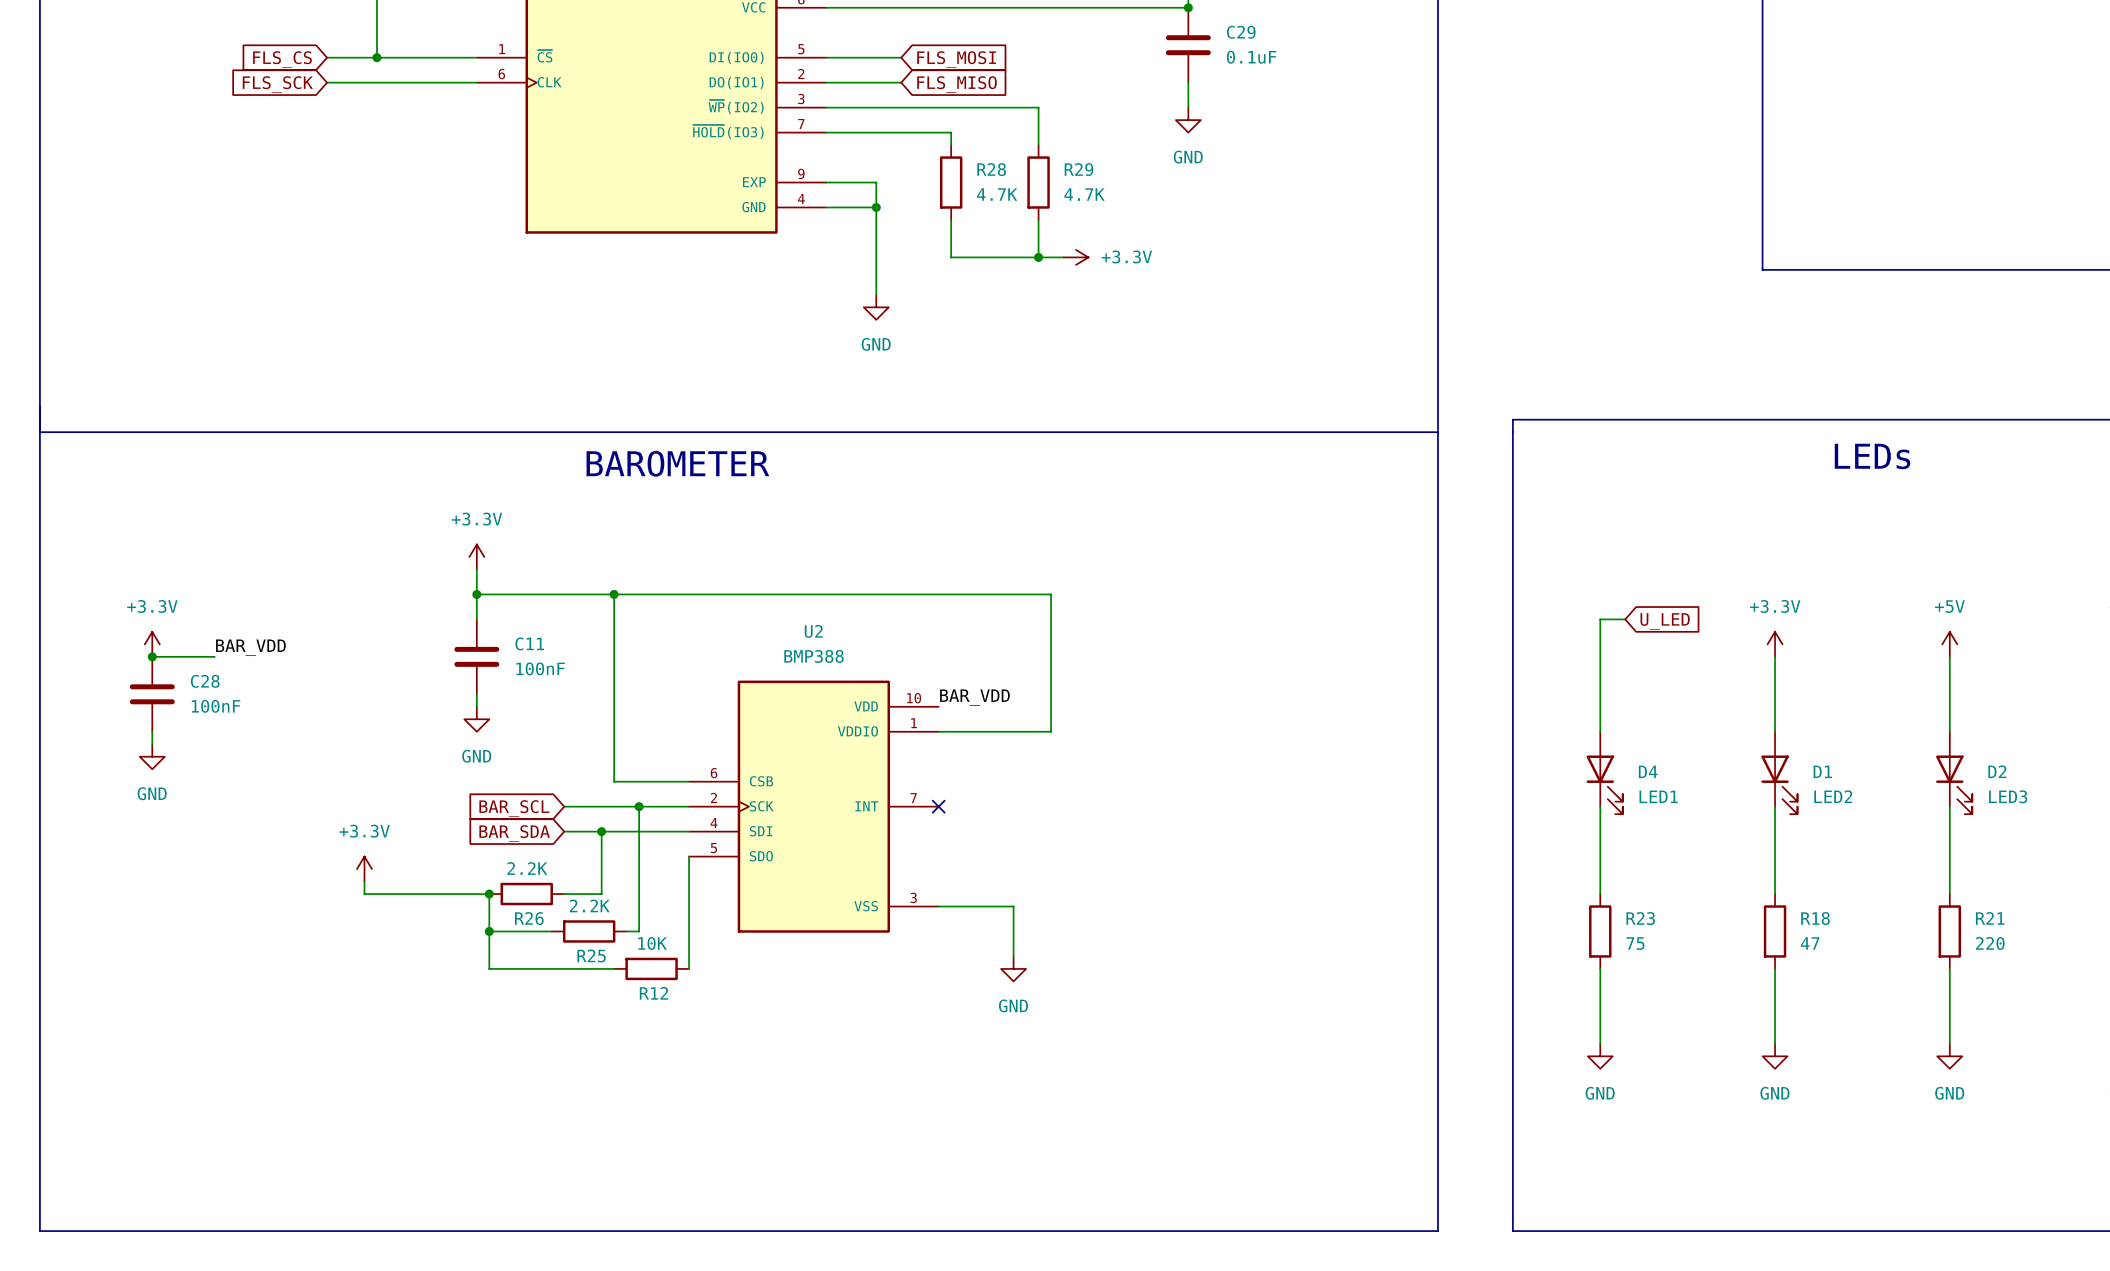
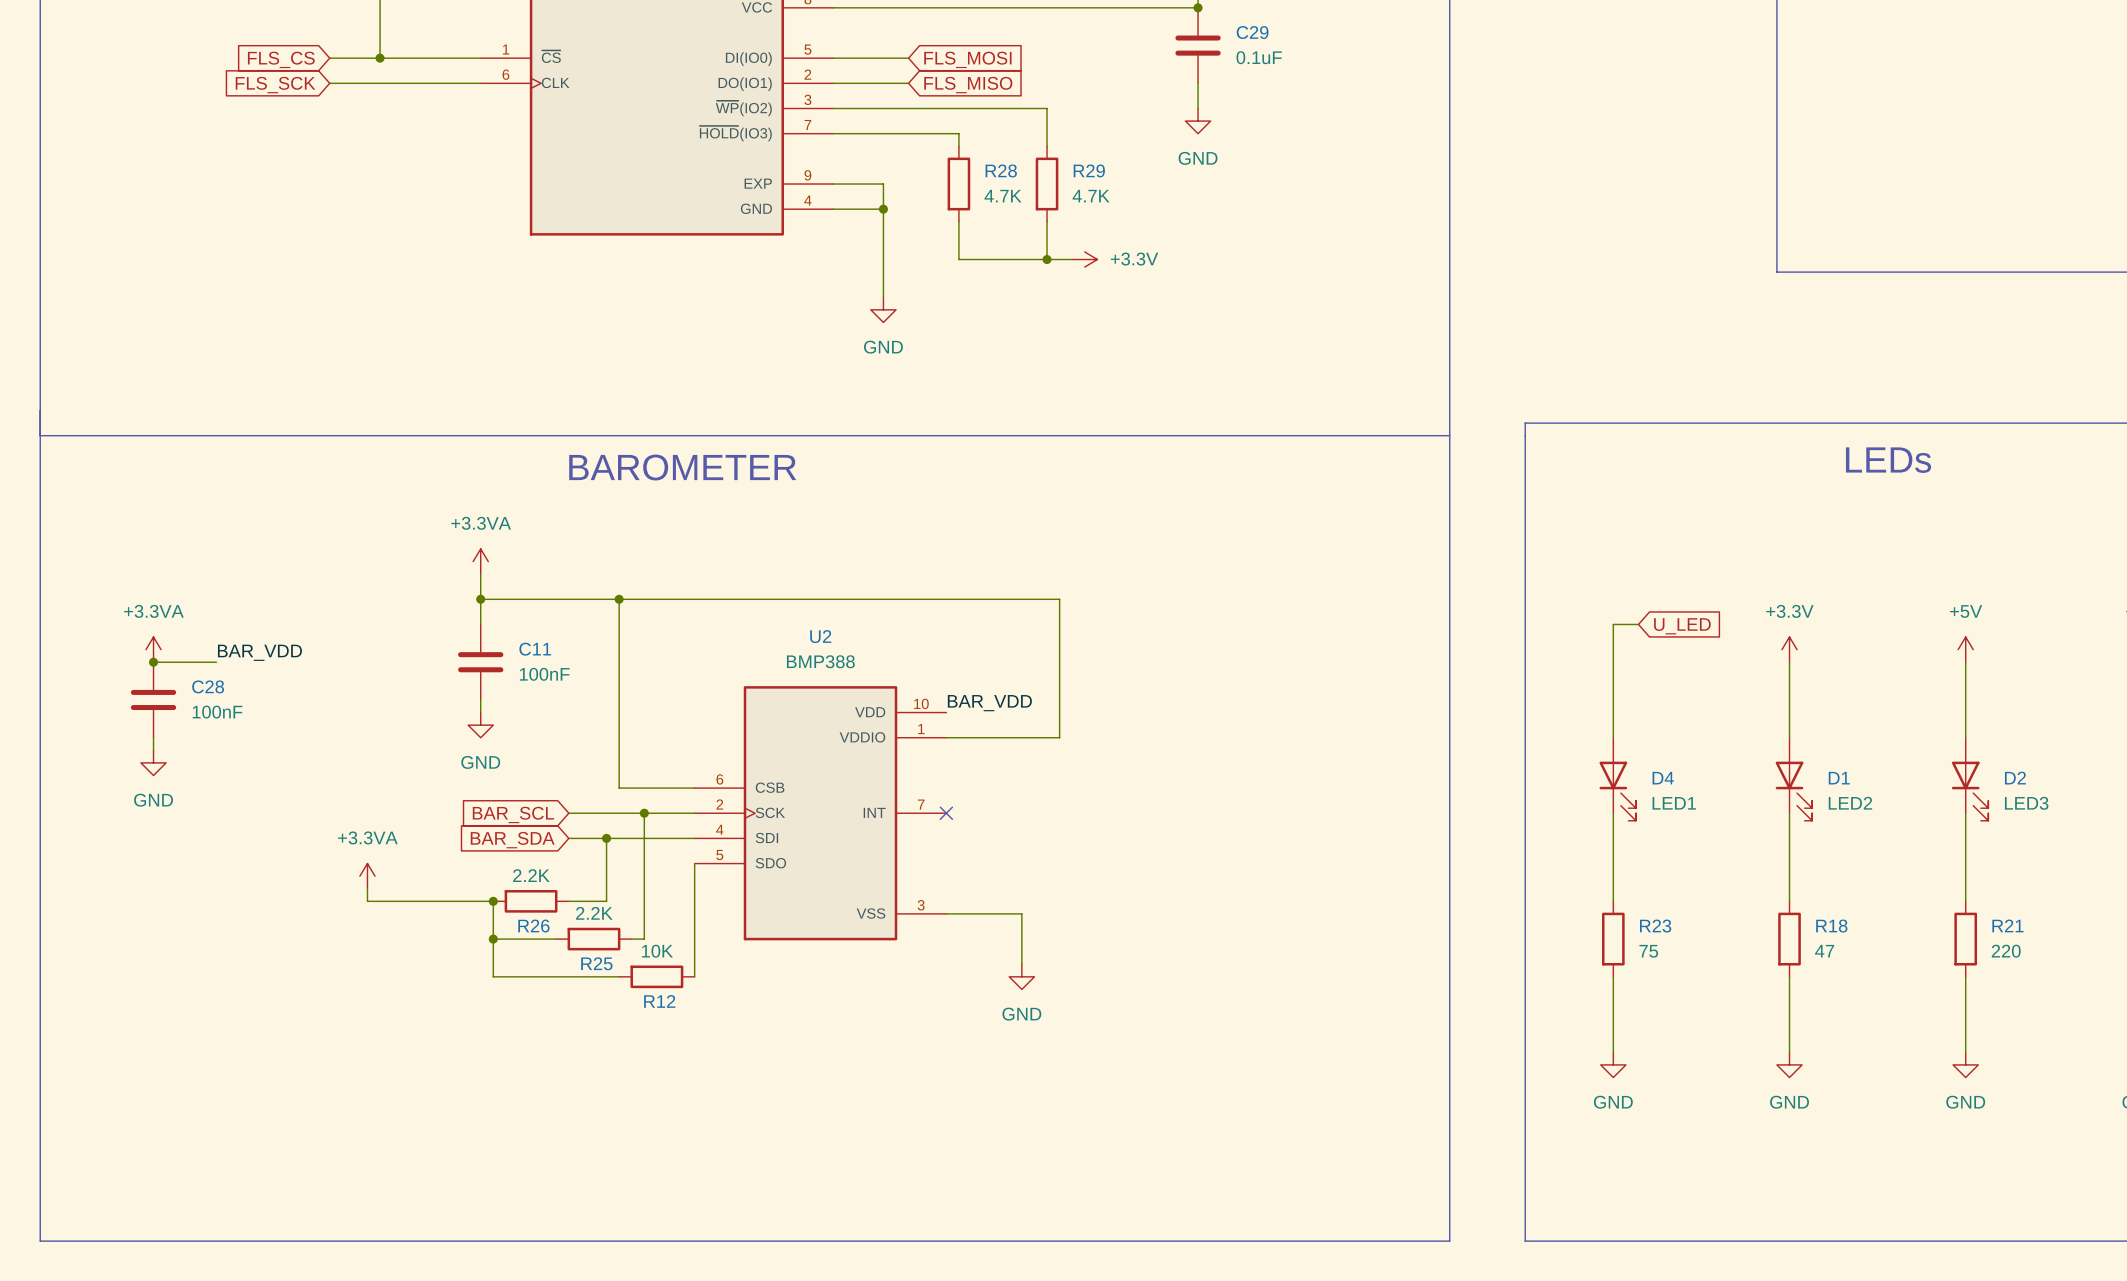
power symbol: +3.3V (476, 557) -> +3.3VA (480, 561)
power symbol: +3.3V (152, 644) -> +3.3VA (153, 649)
power symbol: +3.3V (364, 869) -> +3.3VA (367, 876)

